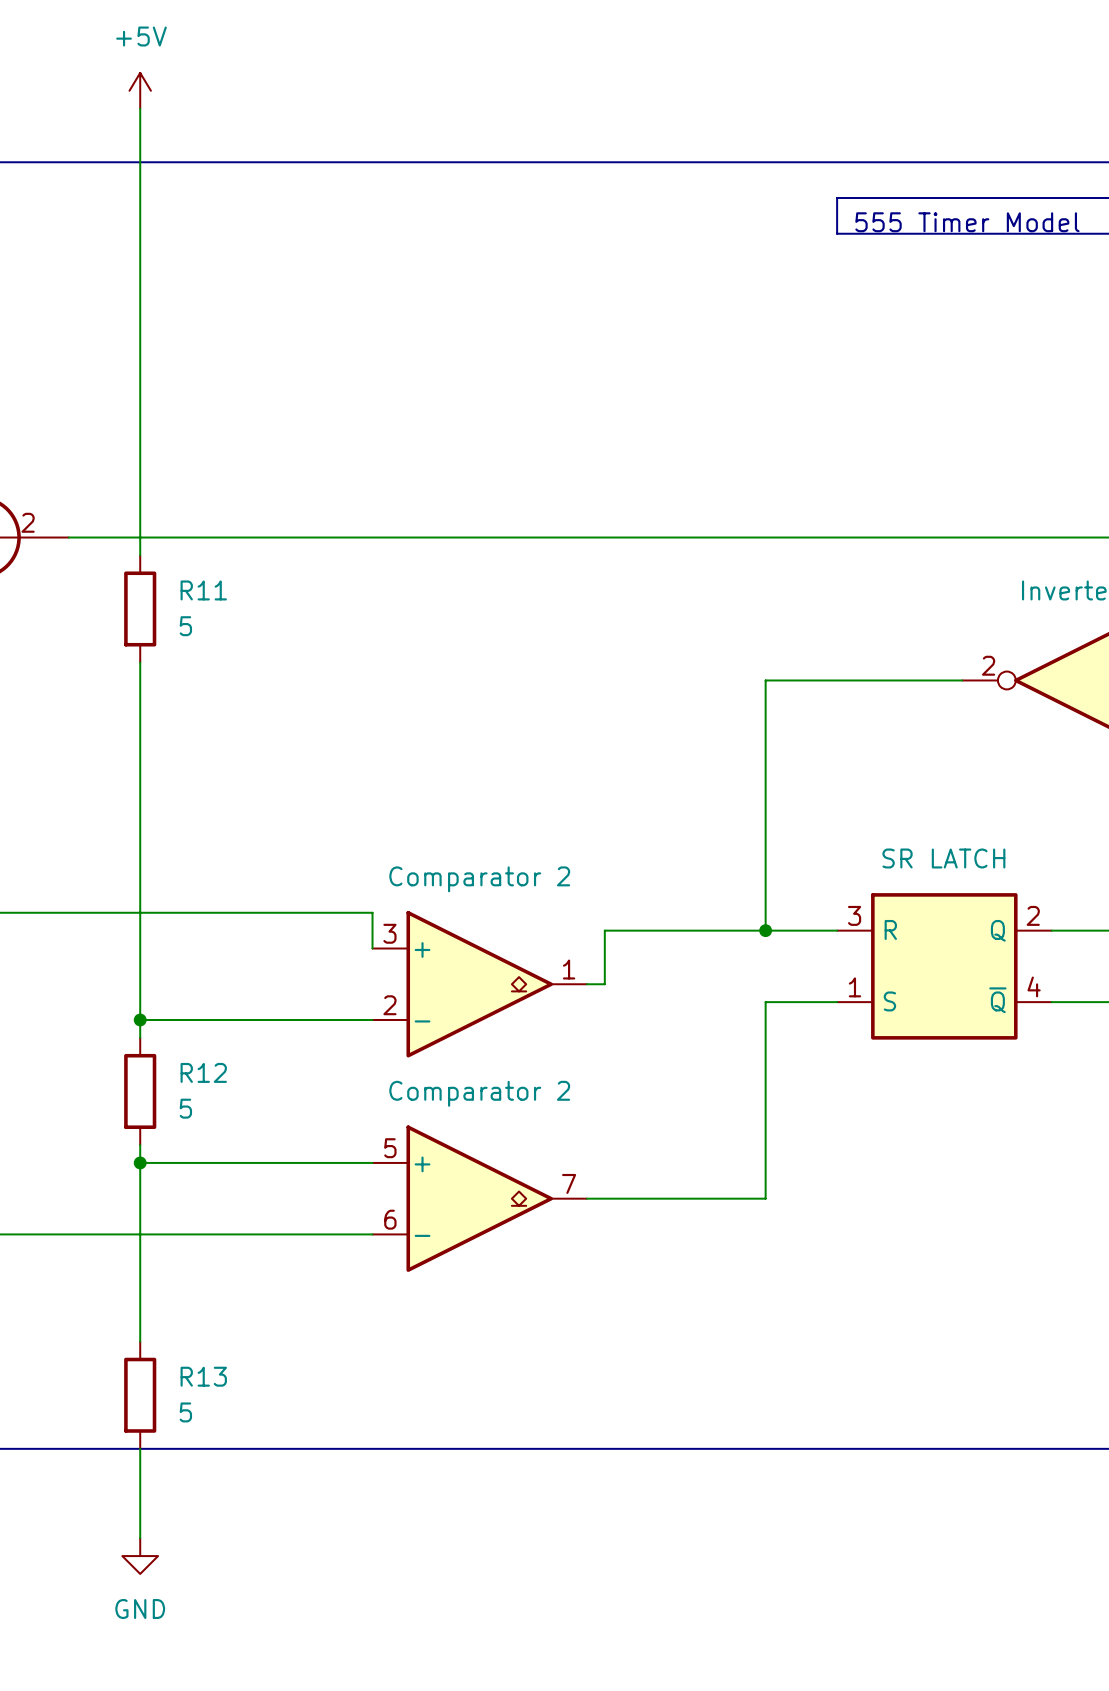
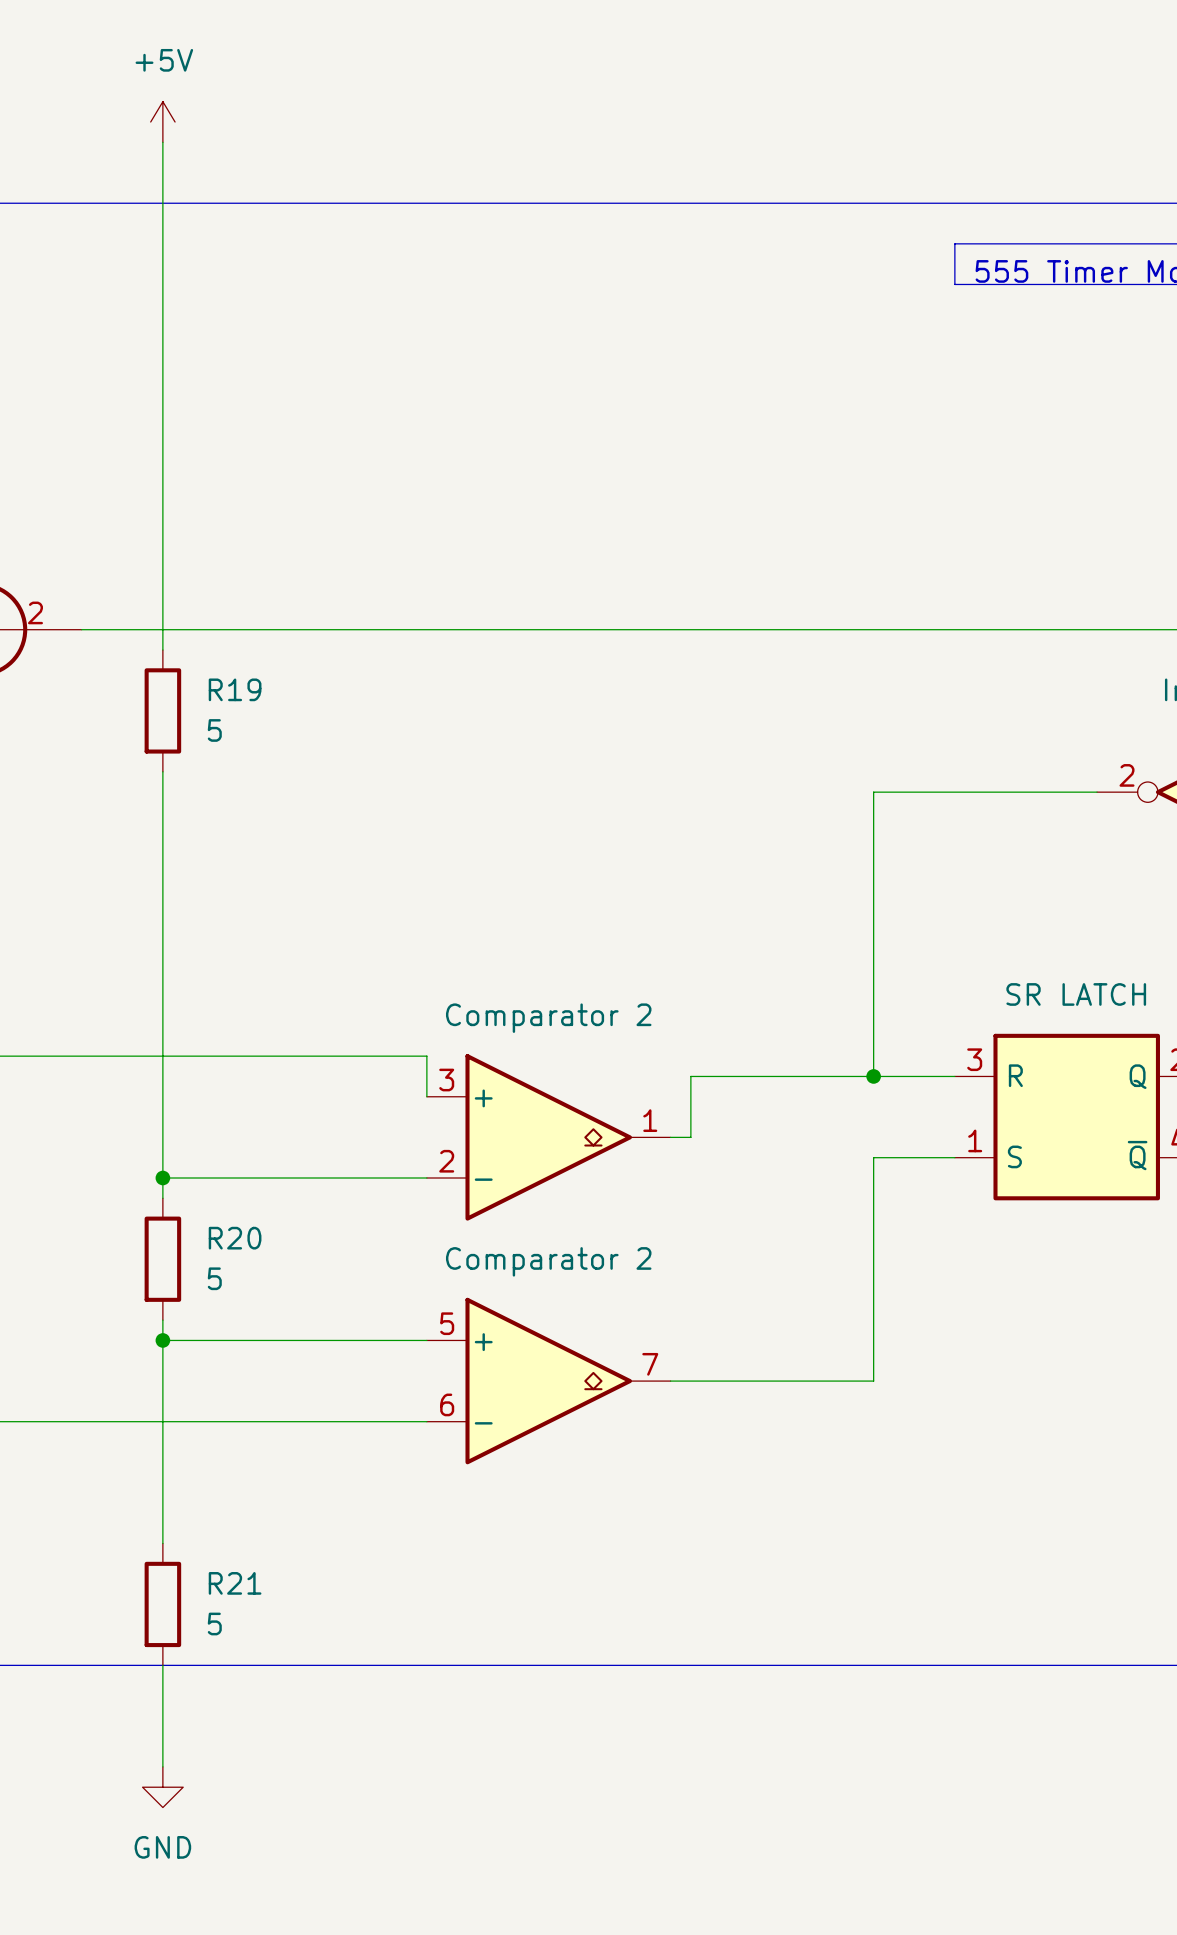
R11 name: R11 (203, 590) -> R19 (235, 689)
R12 name: R12 (203, 1072) -> R20 (235, 1238)
R13 name: R13 (203, 1376) -> R21 (235, 1583)

